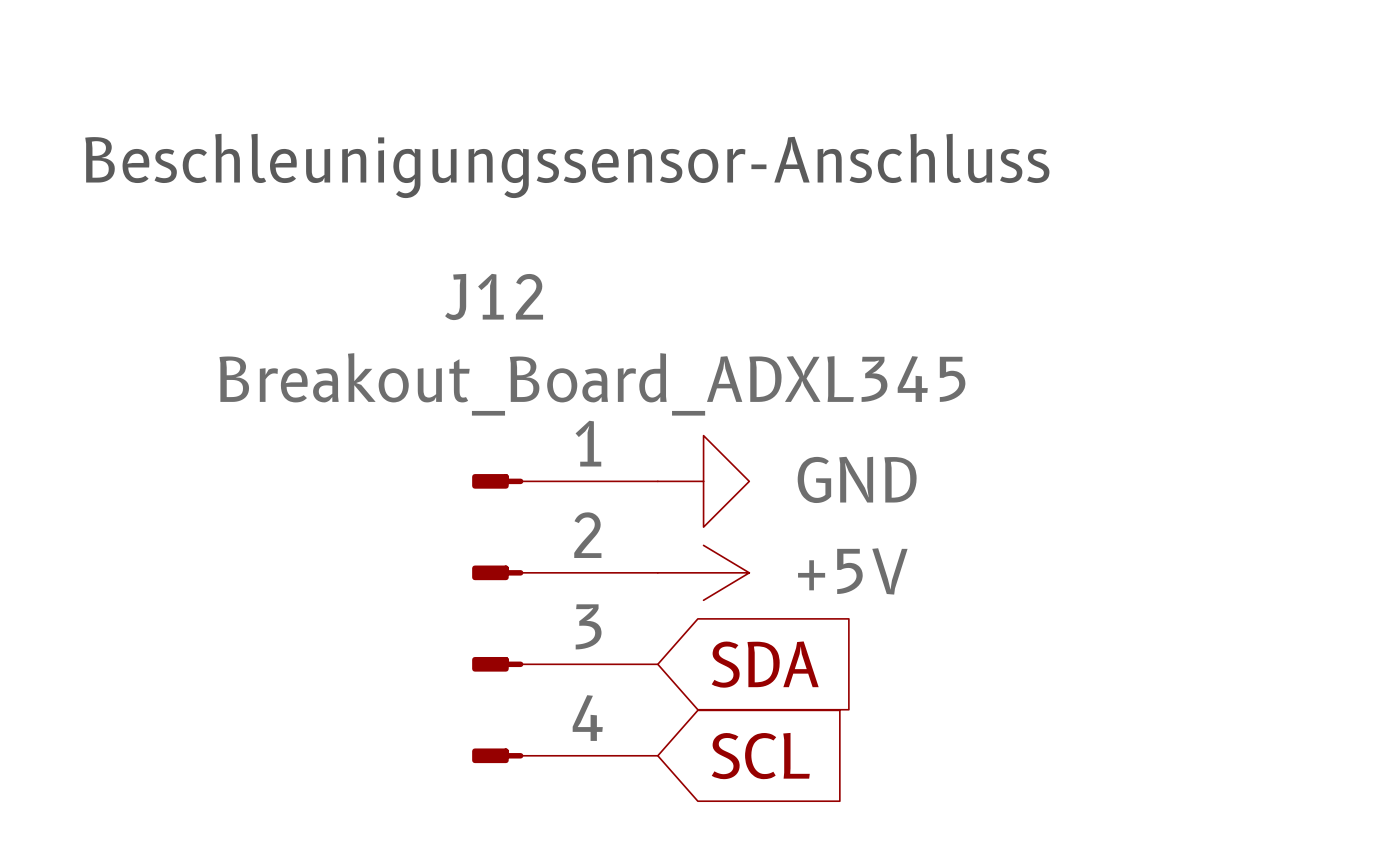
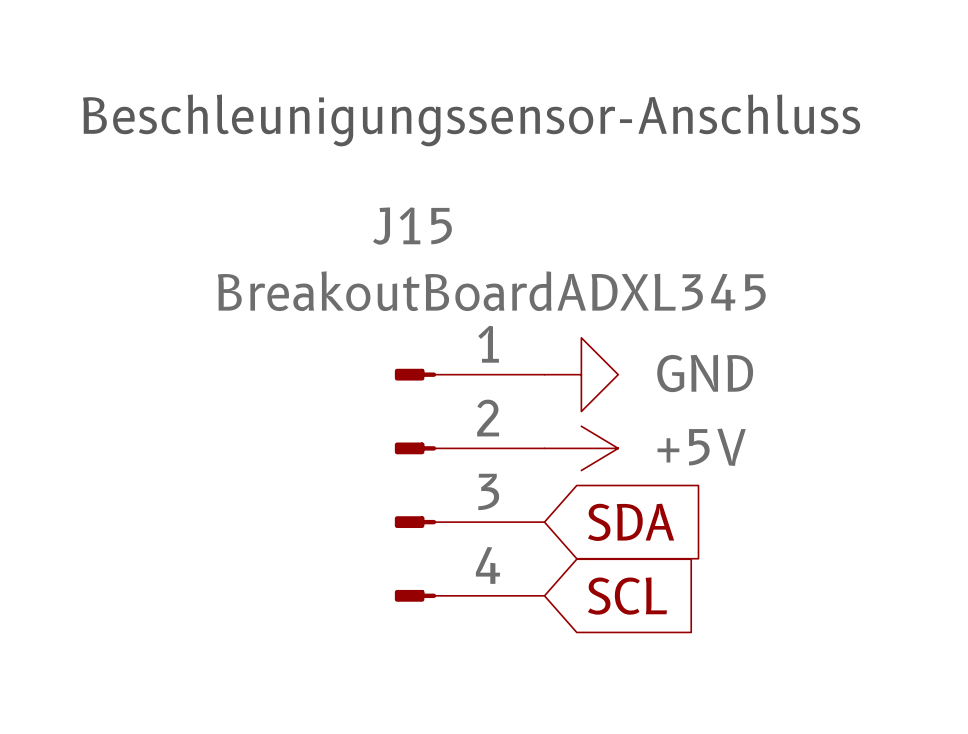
J12 name: J12 (494, 296) -> J15 (412, 226)
J12 value: Breakout_Board_ADXL345 (592, 384) -> BreakoutBoardADXL345 (491, 291)

